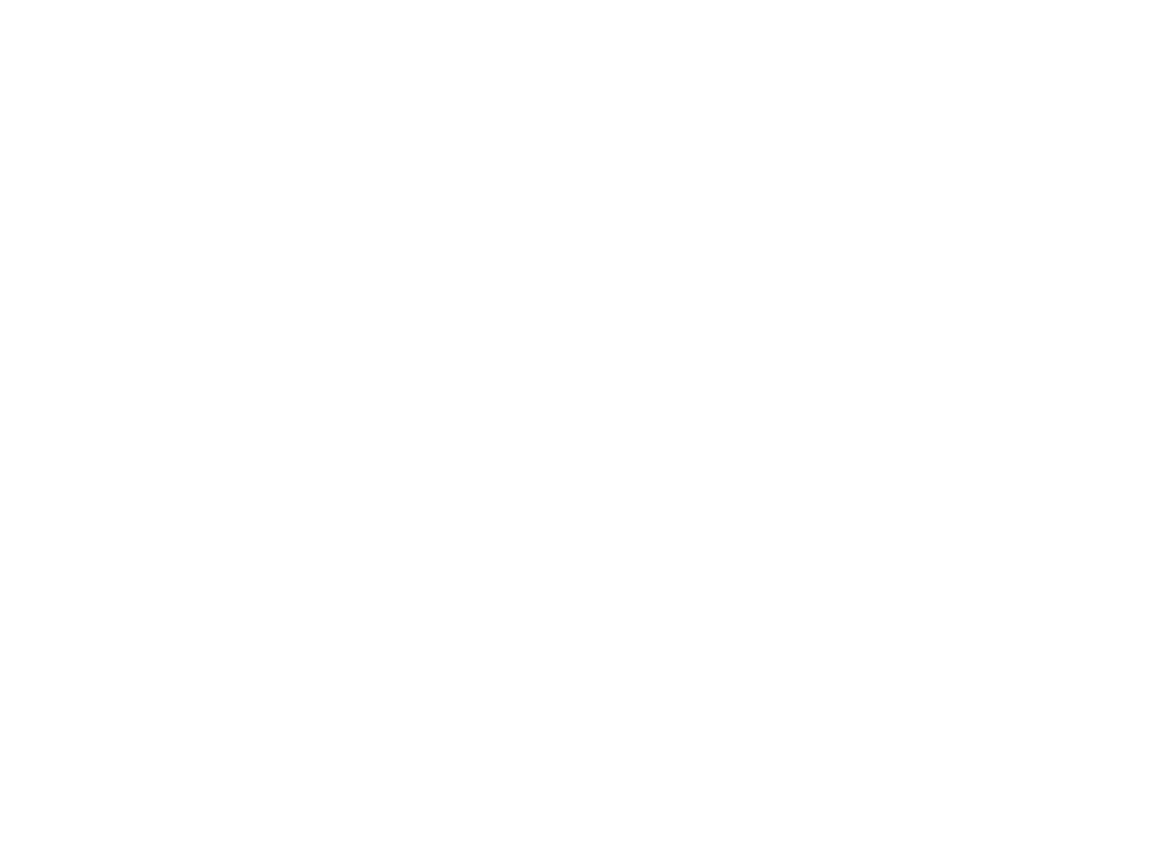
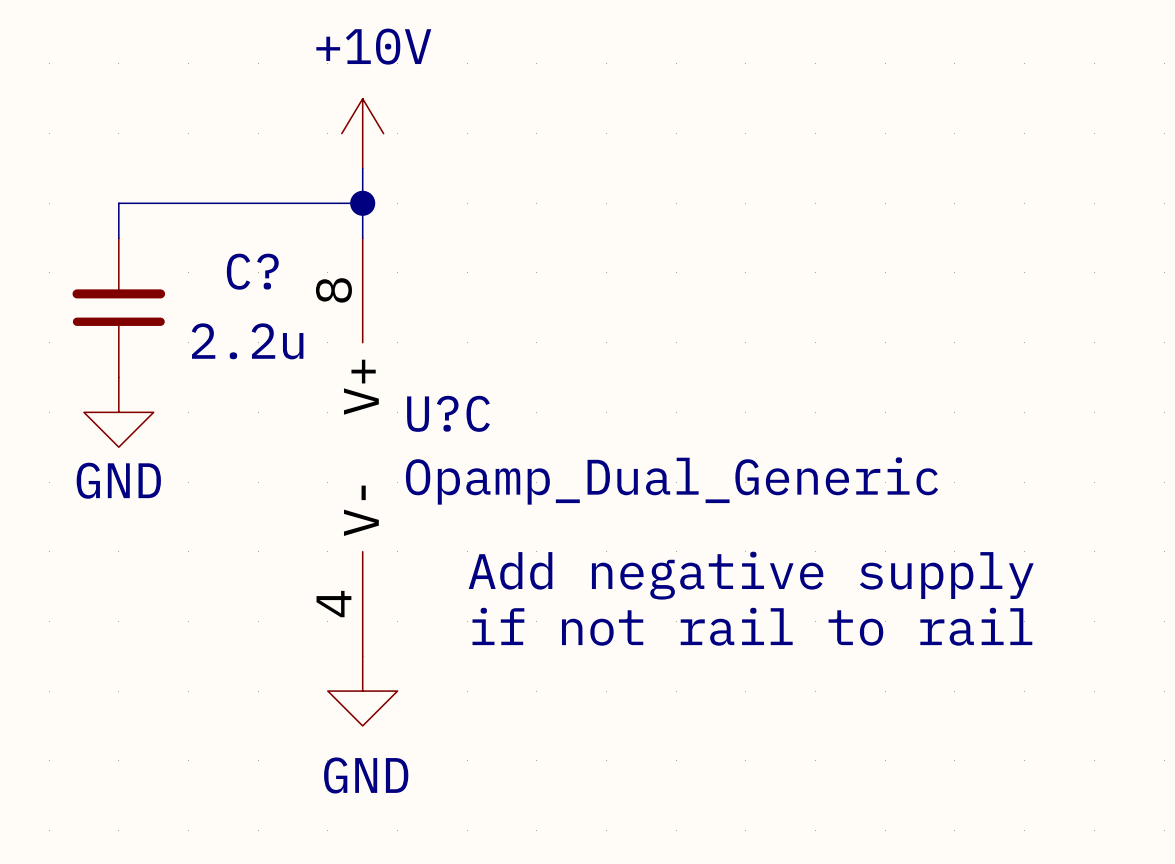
power symbol: none -> +10V (362, 133)
wire: none -> (362, 168) (362, 238)
wire: none -> (362, 203) (118, 203) (118, 238)
junction: none -> (362, 203)
C?: none -> 2.2u (118, 307)
power symbol: none -> GND (118, 412)
U?C: none -> Opamp_Dual_Generic (362, 447)
text: none -> Add negative supply (751, 575)
text: none -> if not rail to rail (752, 626)
power symbol: none -> GND (362, 691)

